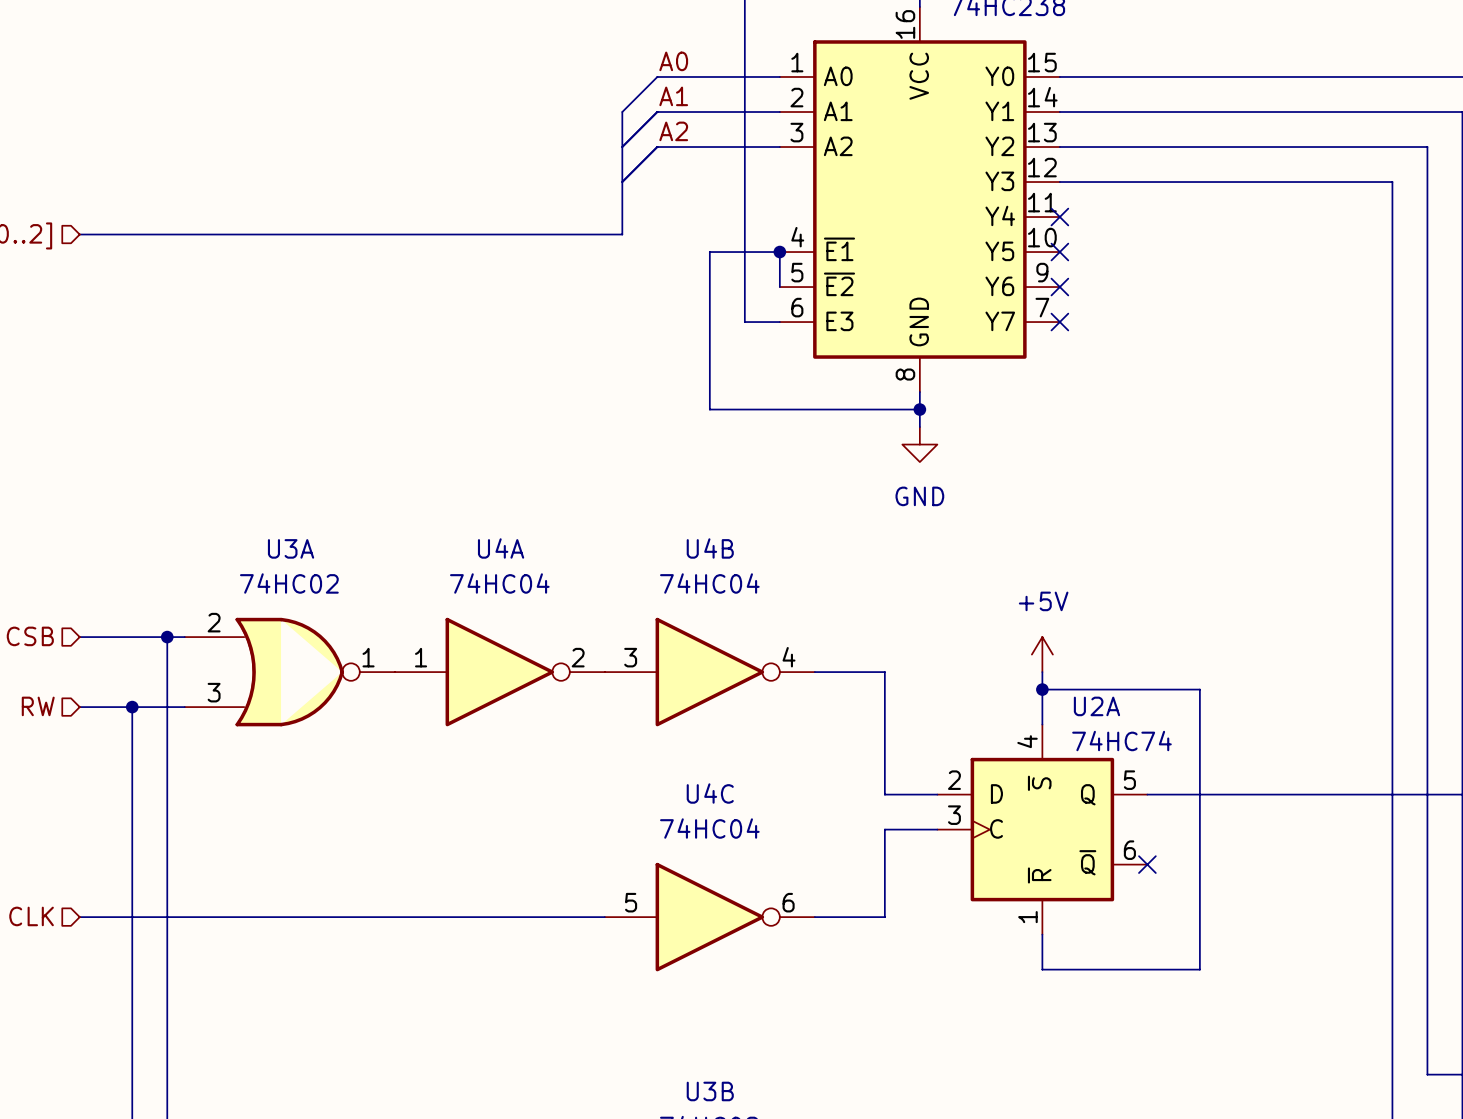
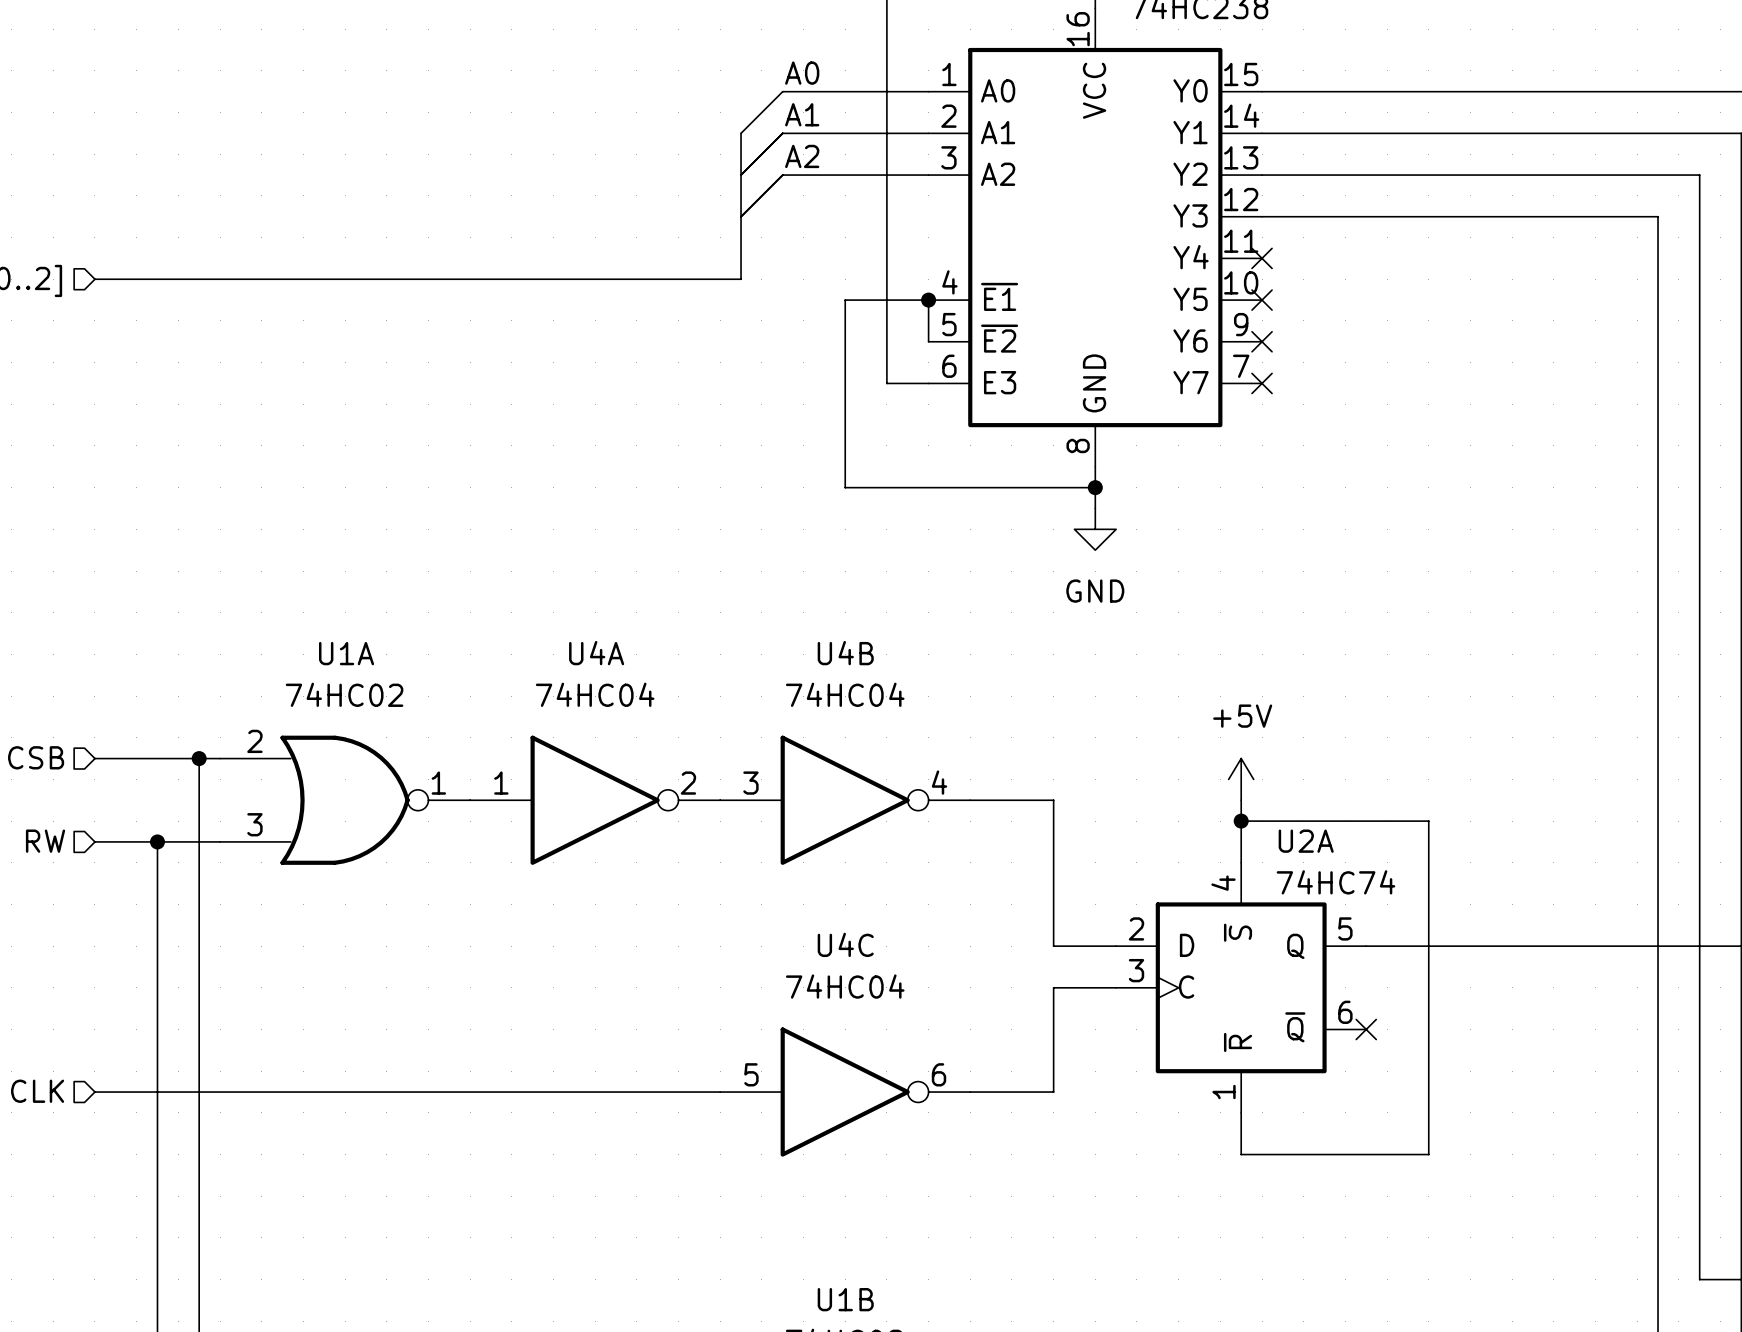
U3A name: U3A (291, 548) -> U1A (346, 653)
U3B name: U3B (710, 1091) -> U1B (845, 1299)

